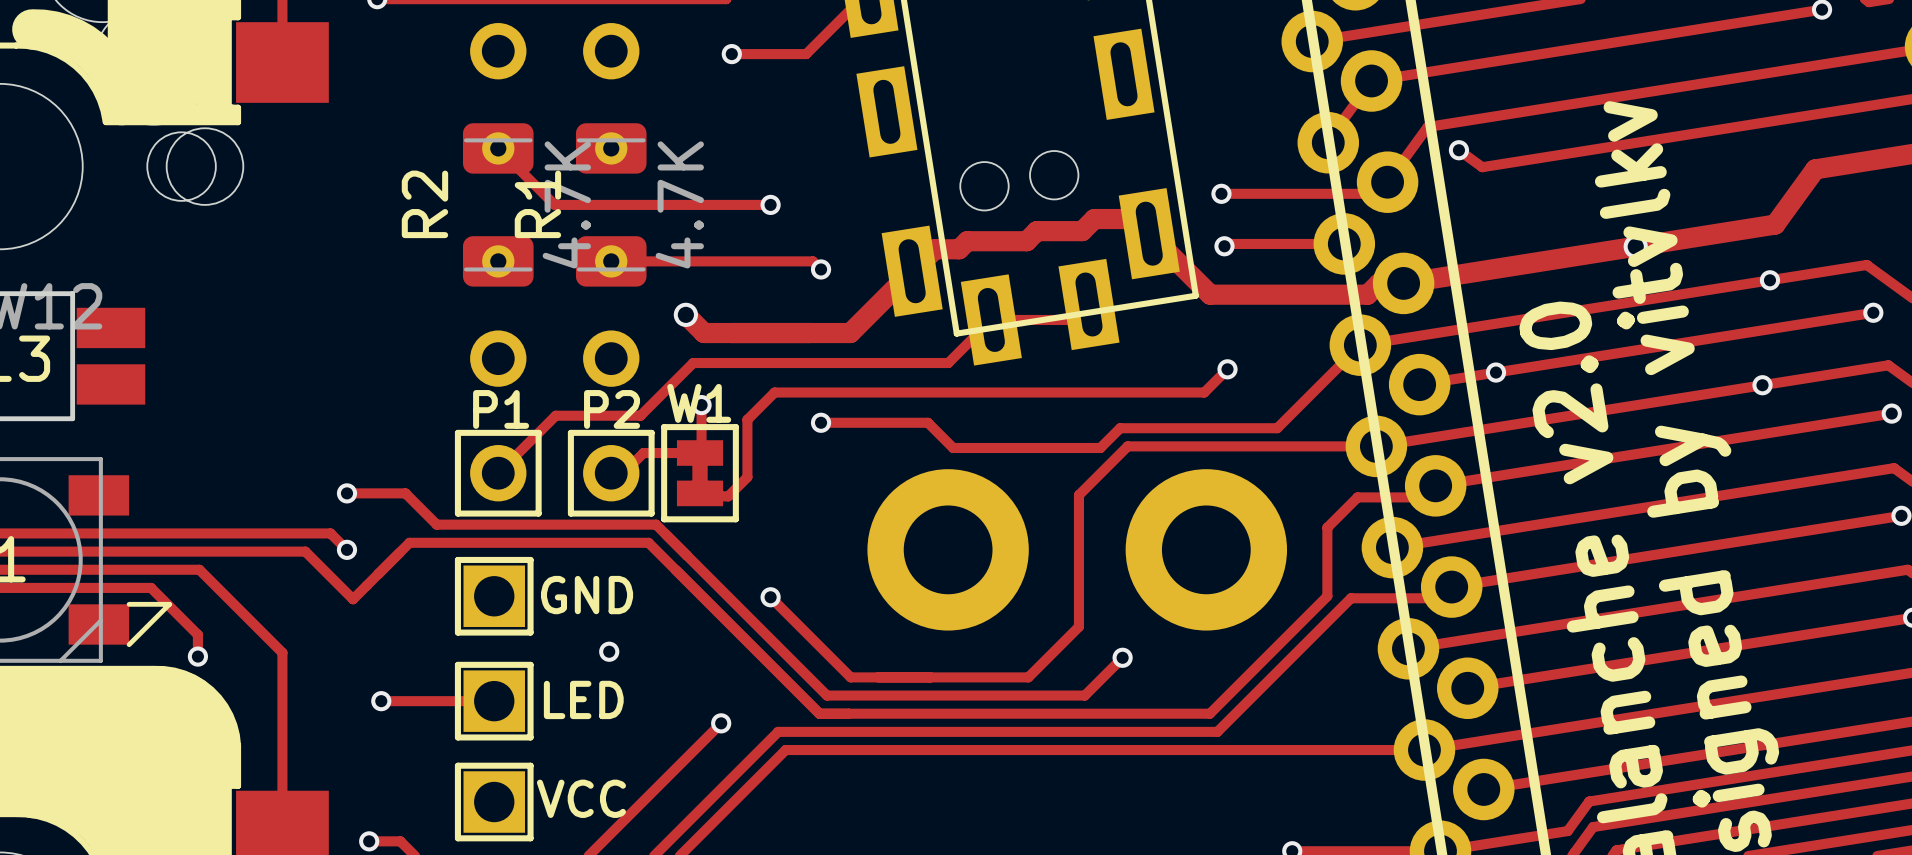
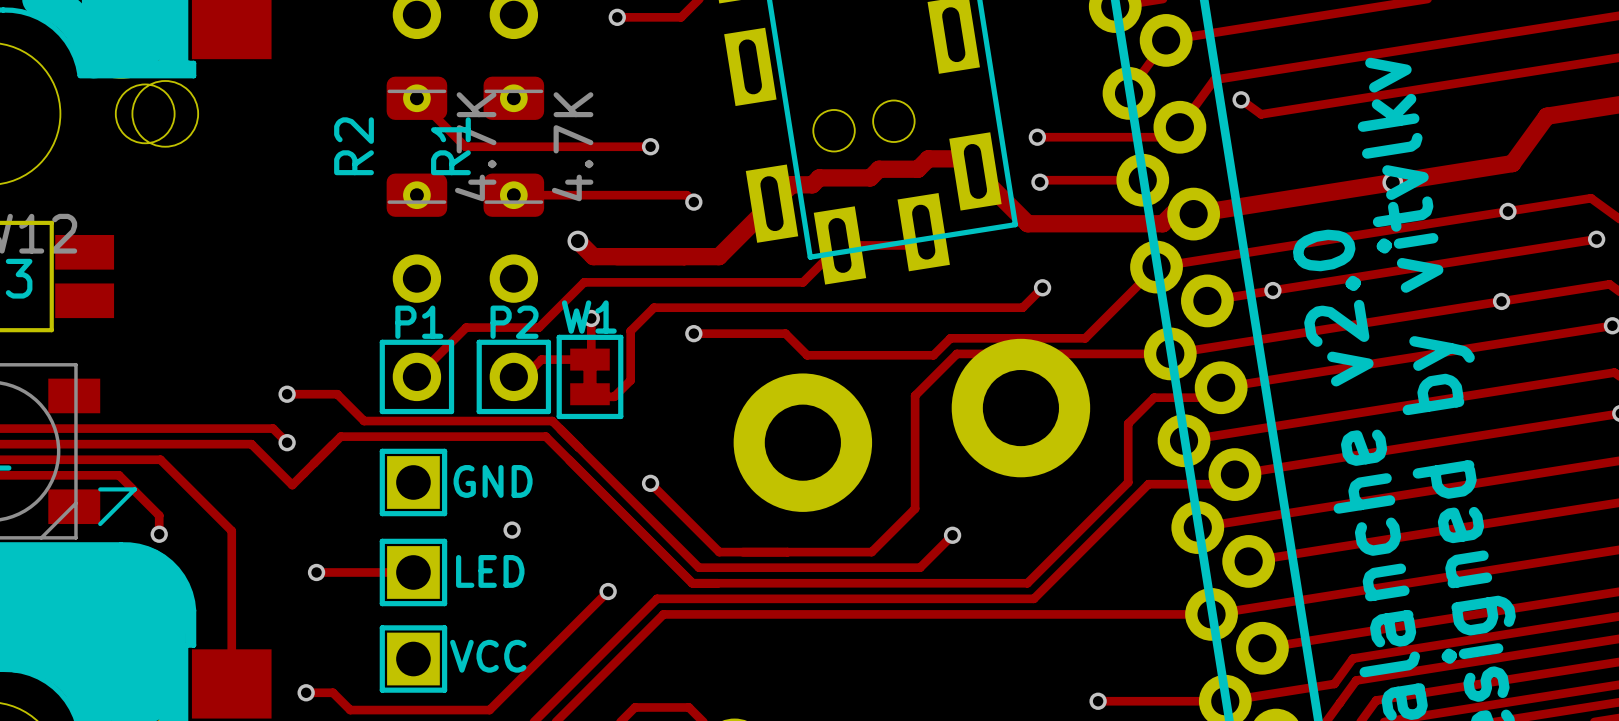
part position: (1206, 549) -> (1020, 408)

